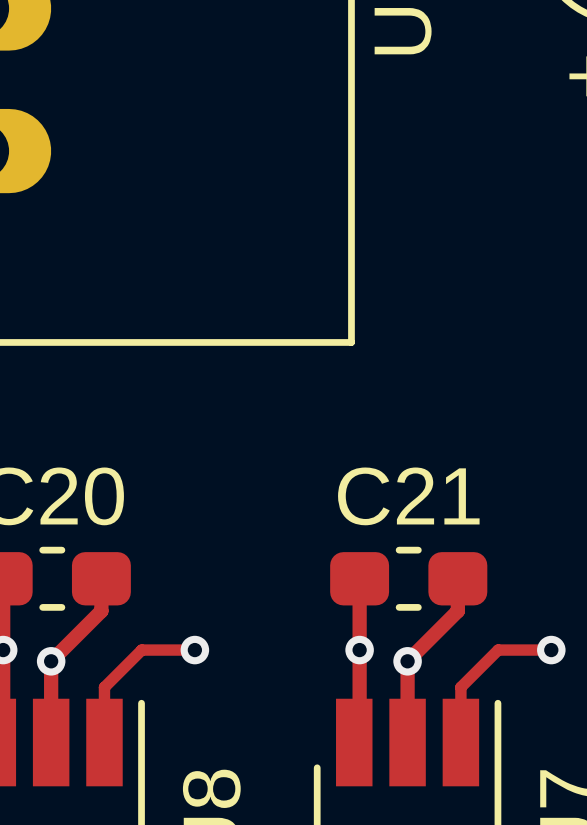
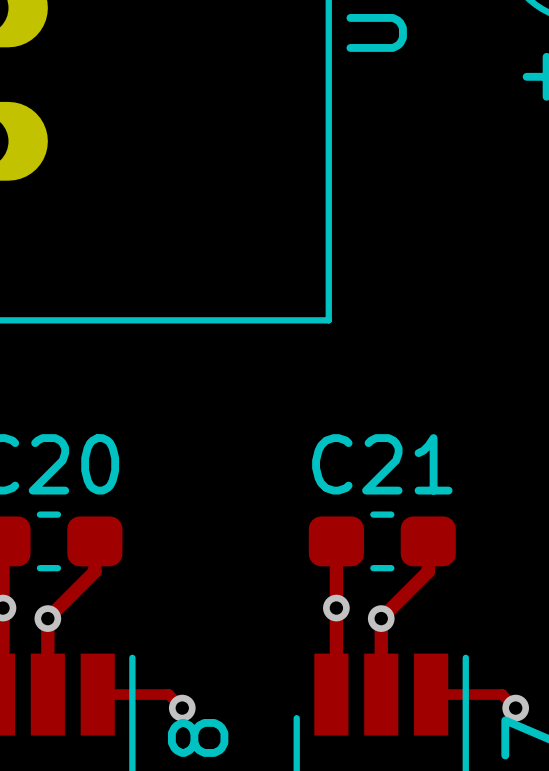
track: (194, 650) (141, 650) (104, 687) (104, 742) -> (182, 708) (168, 694) (97, 694)
via position: (194, 650) -> (182, 708)
track: (551, 650) (498, 650) (460, 687) (460, 742) -> (515, 708) (502, 694) (431, 694)
via position: (551, 650) -> (515, 708)

